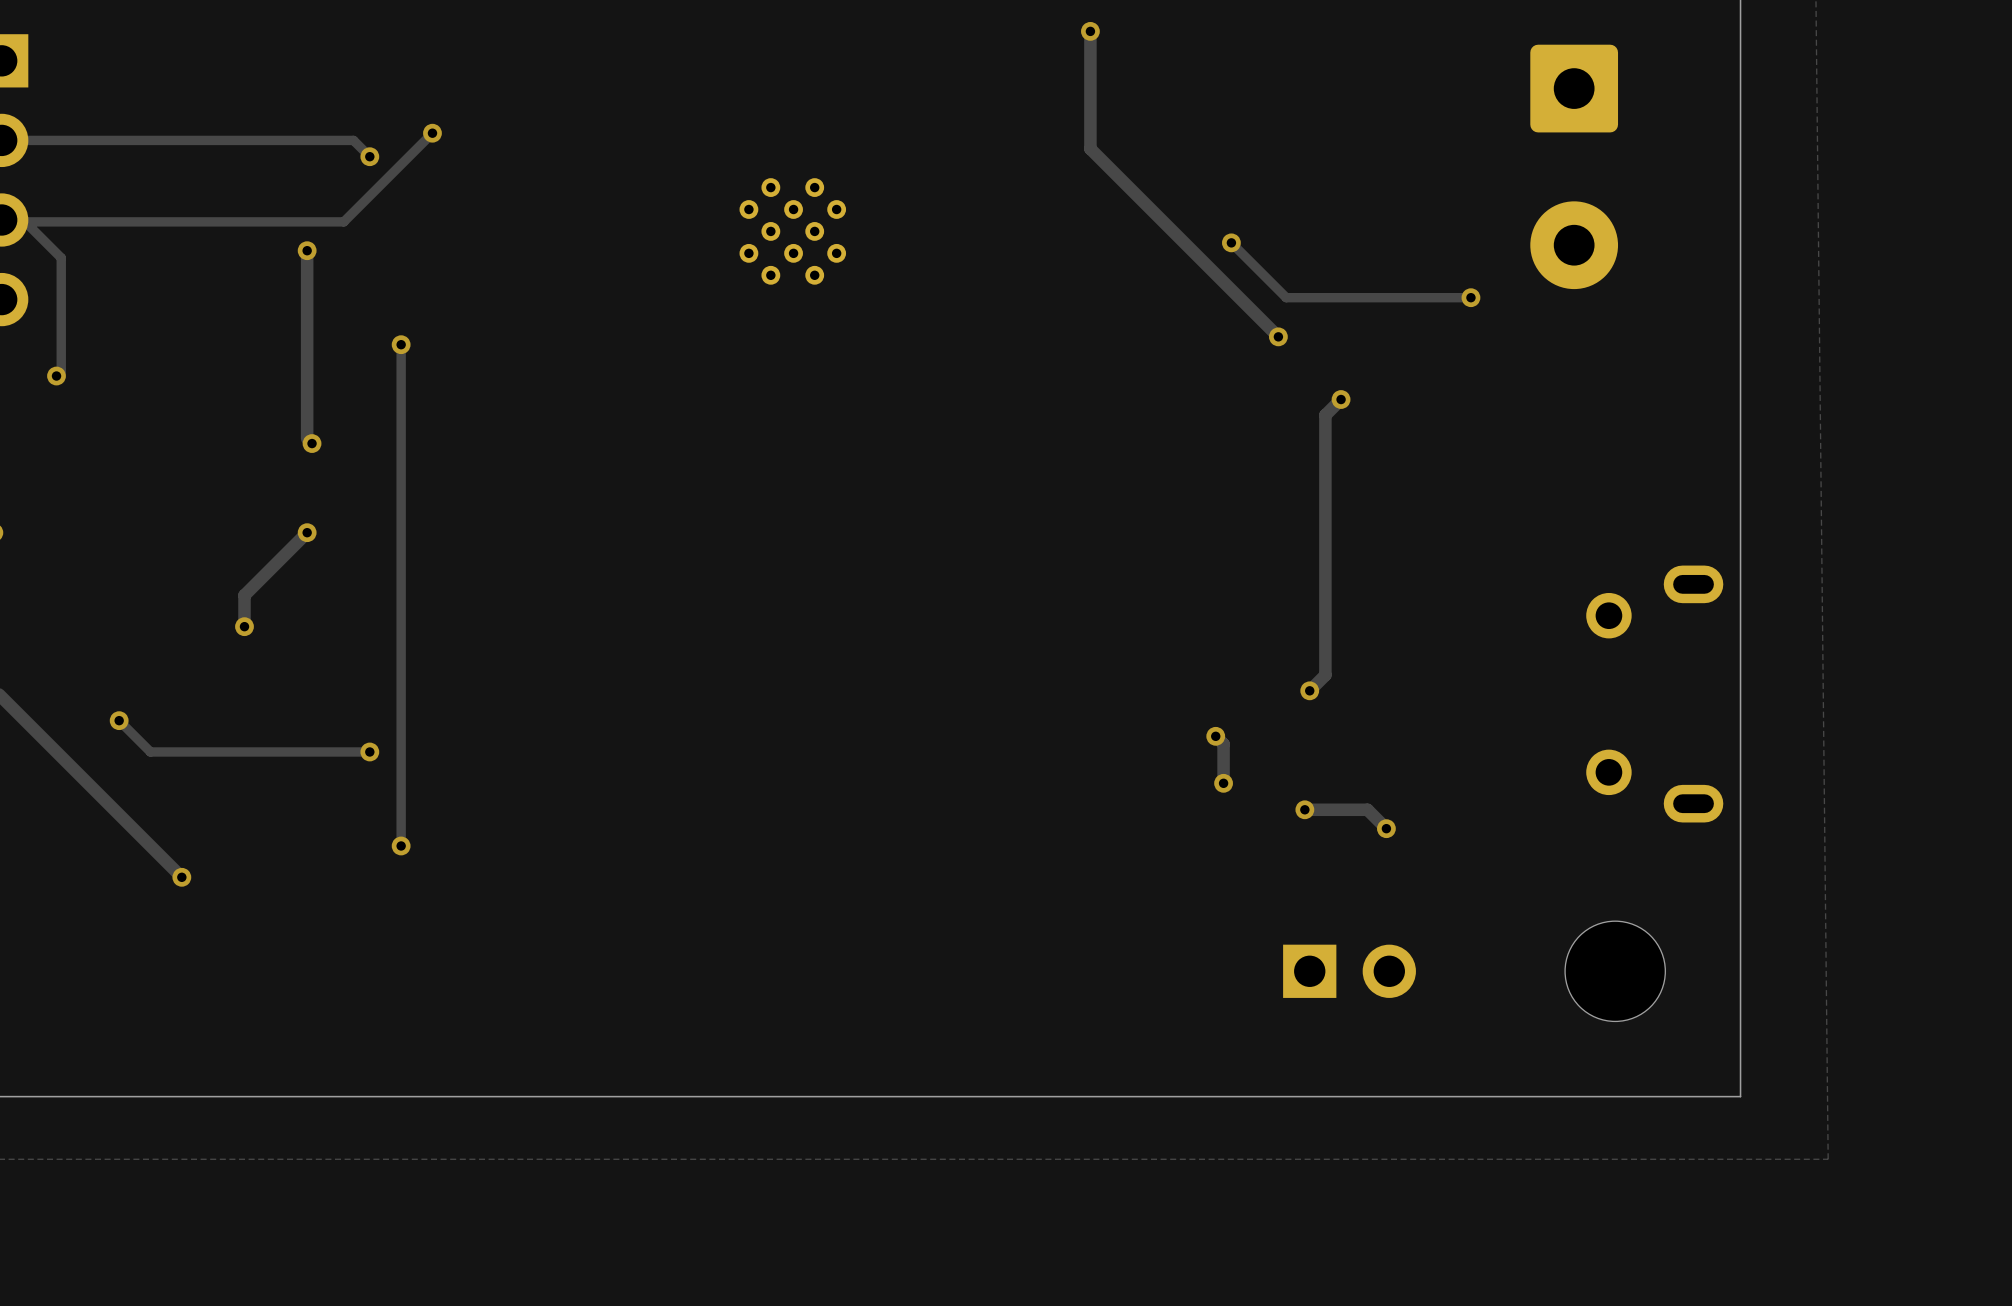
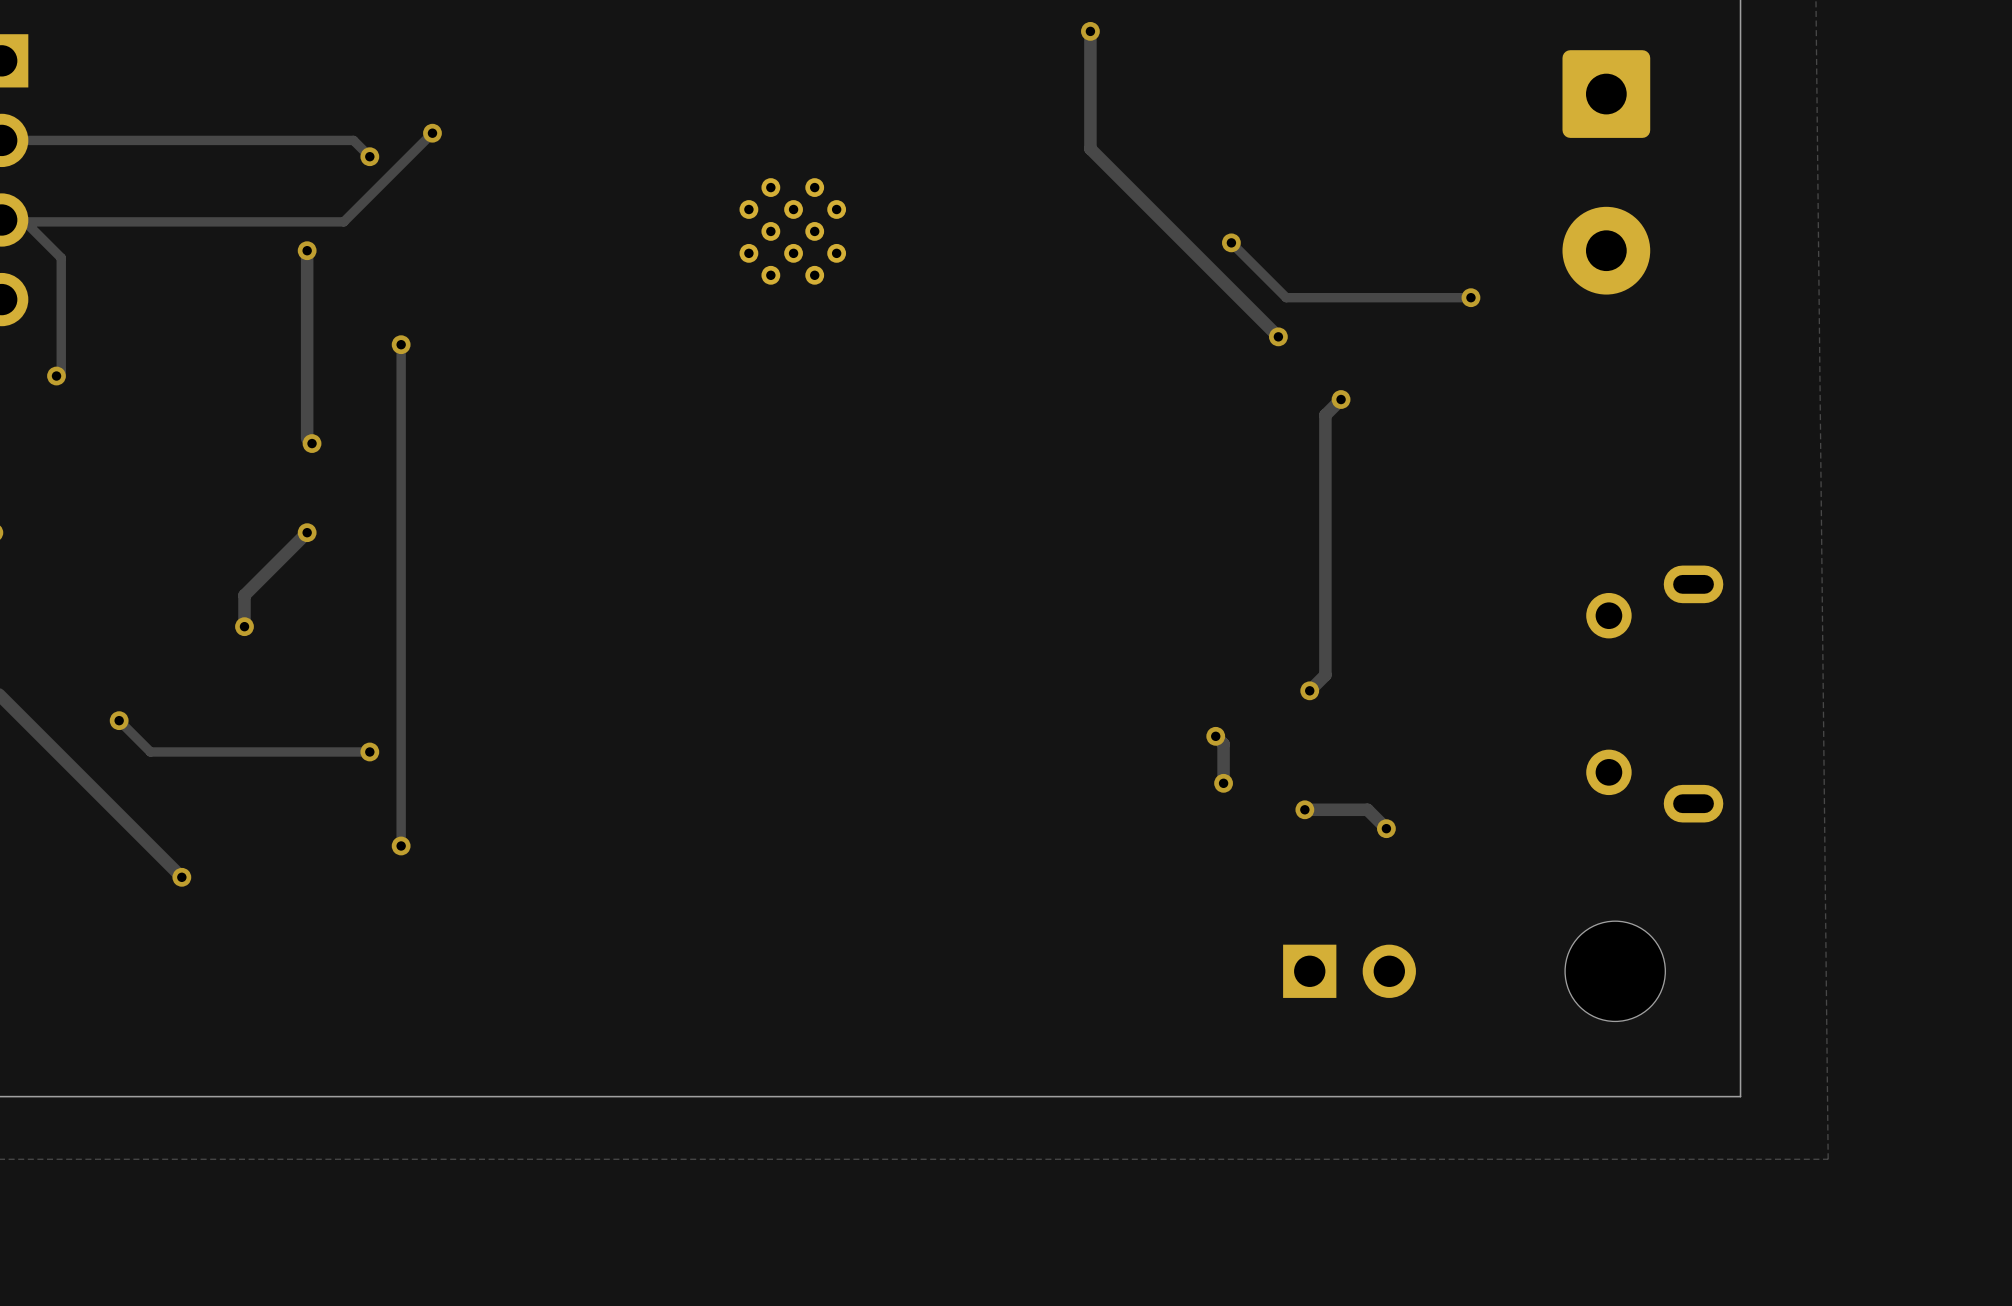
part position: (1574, 166) -> (1606, 172)

